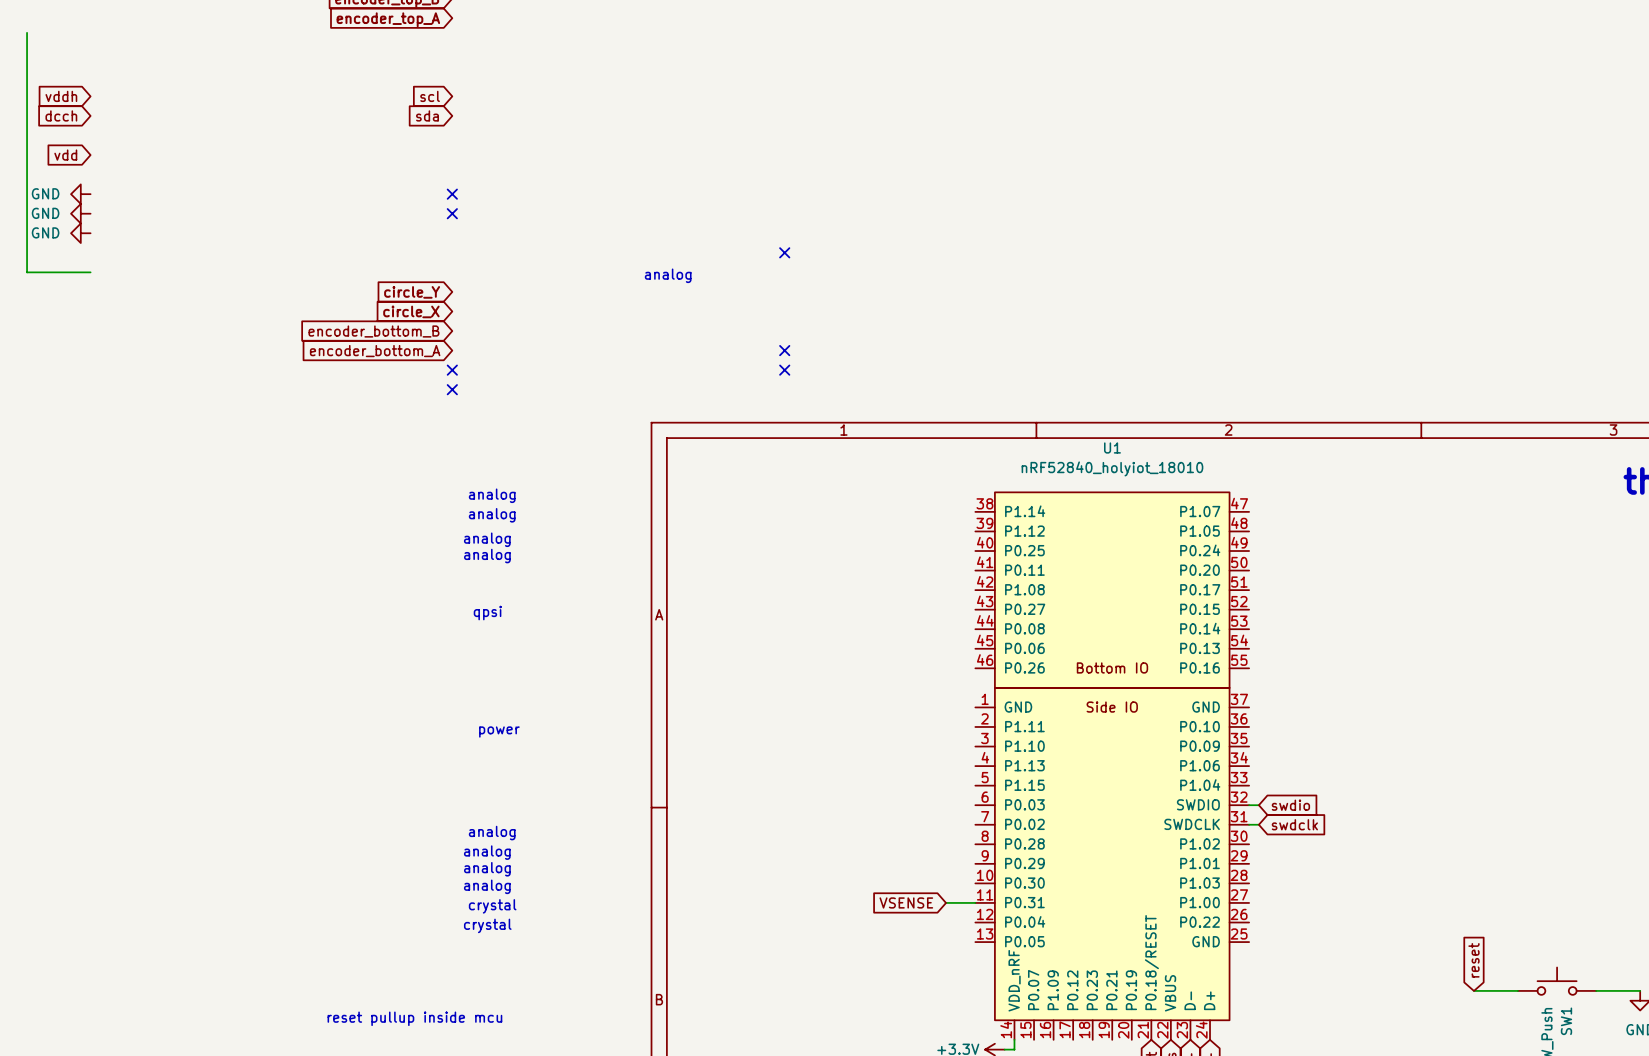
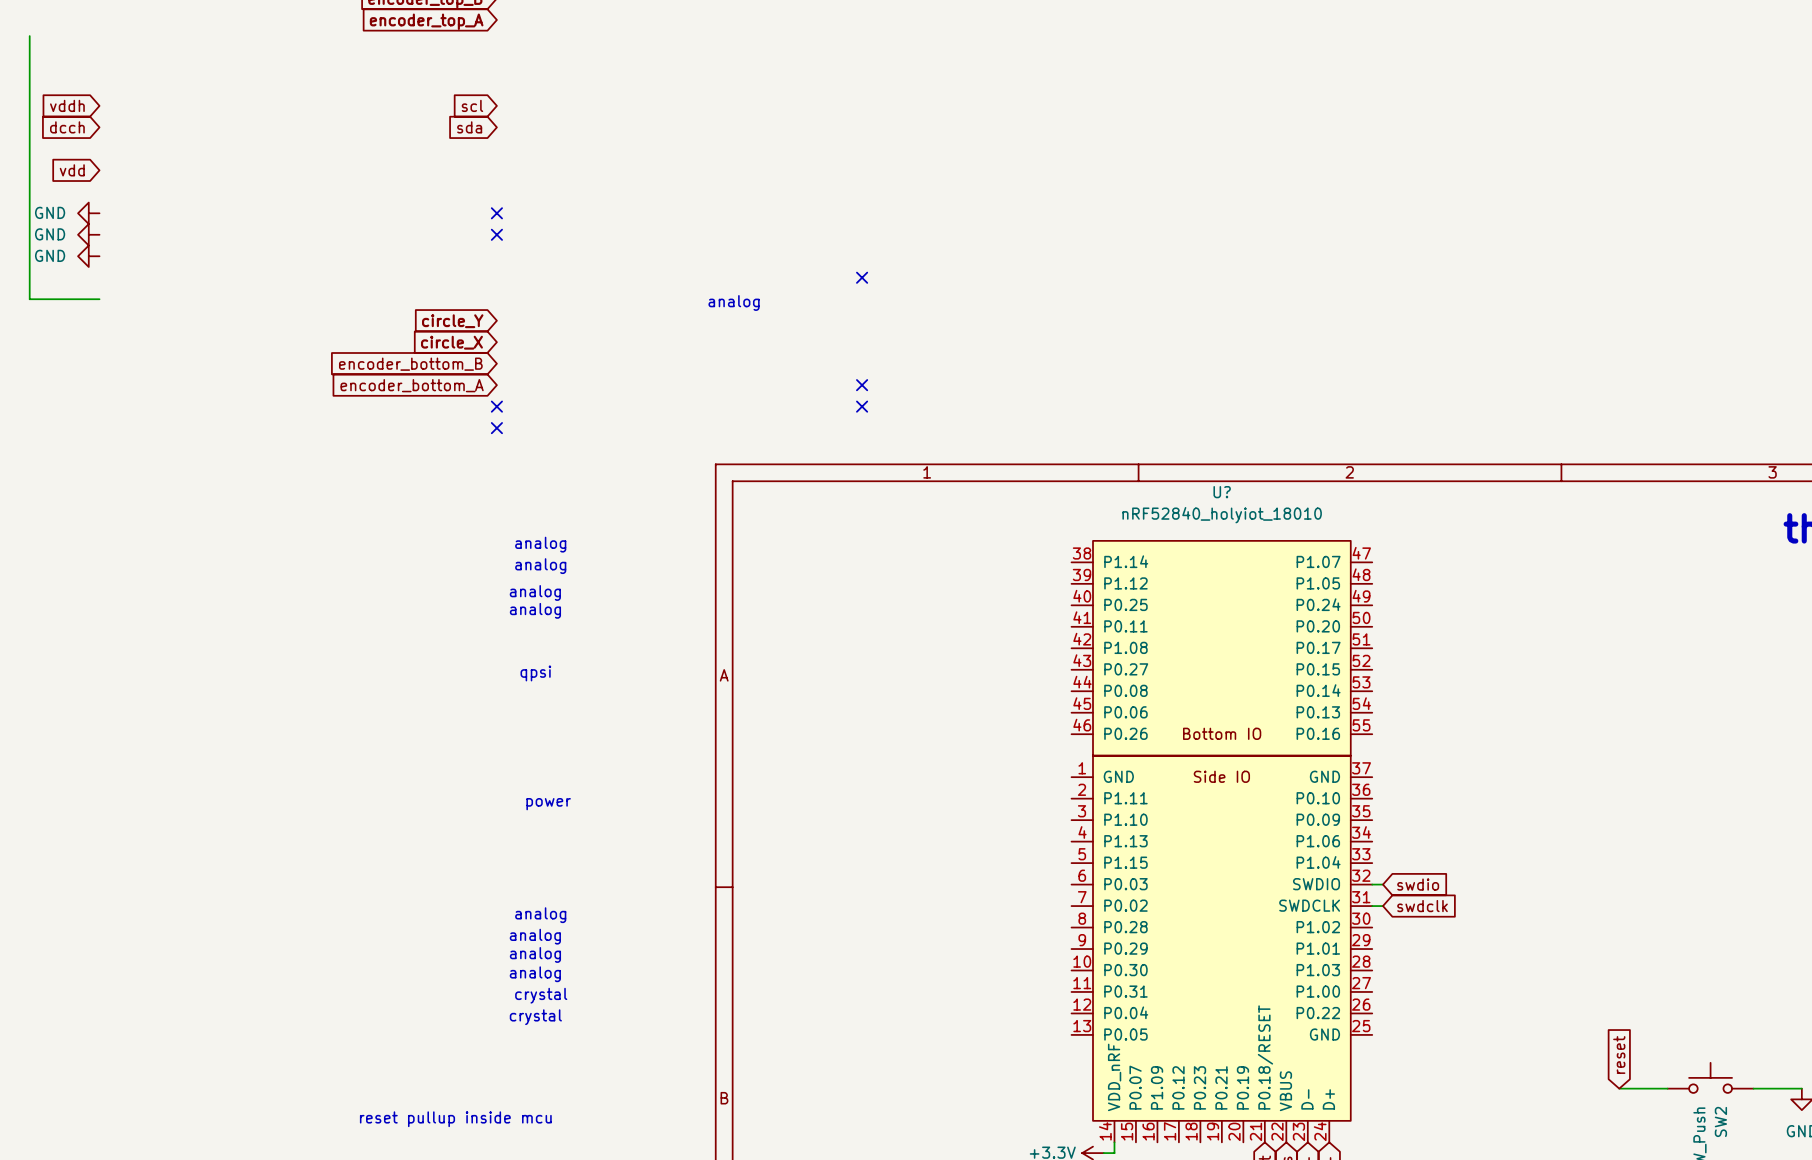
U1 name: U1 (1112, 447) -> U? (1222, 492)
global label: VSENSE (906, 902) -> none
wire: (946, 902) (975, 902) -> none
SW1 name: SW1 (1566, 1021) -> SW2 (1720, 1121)

